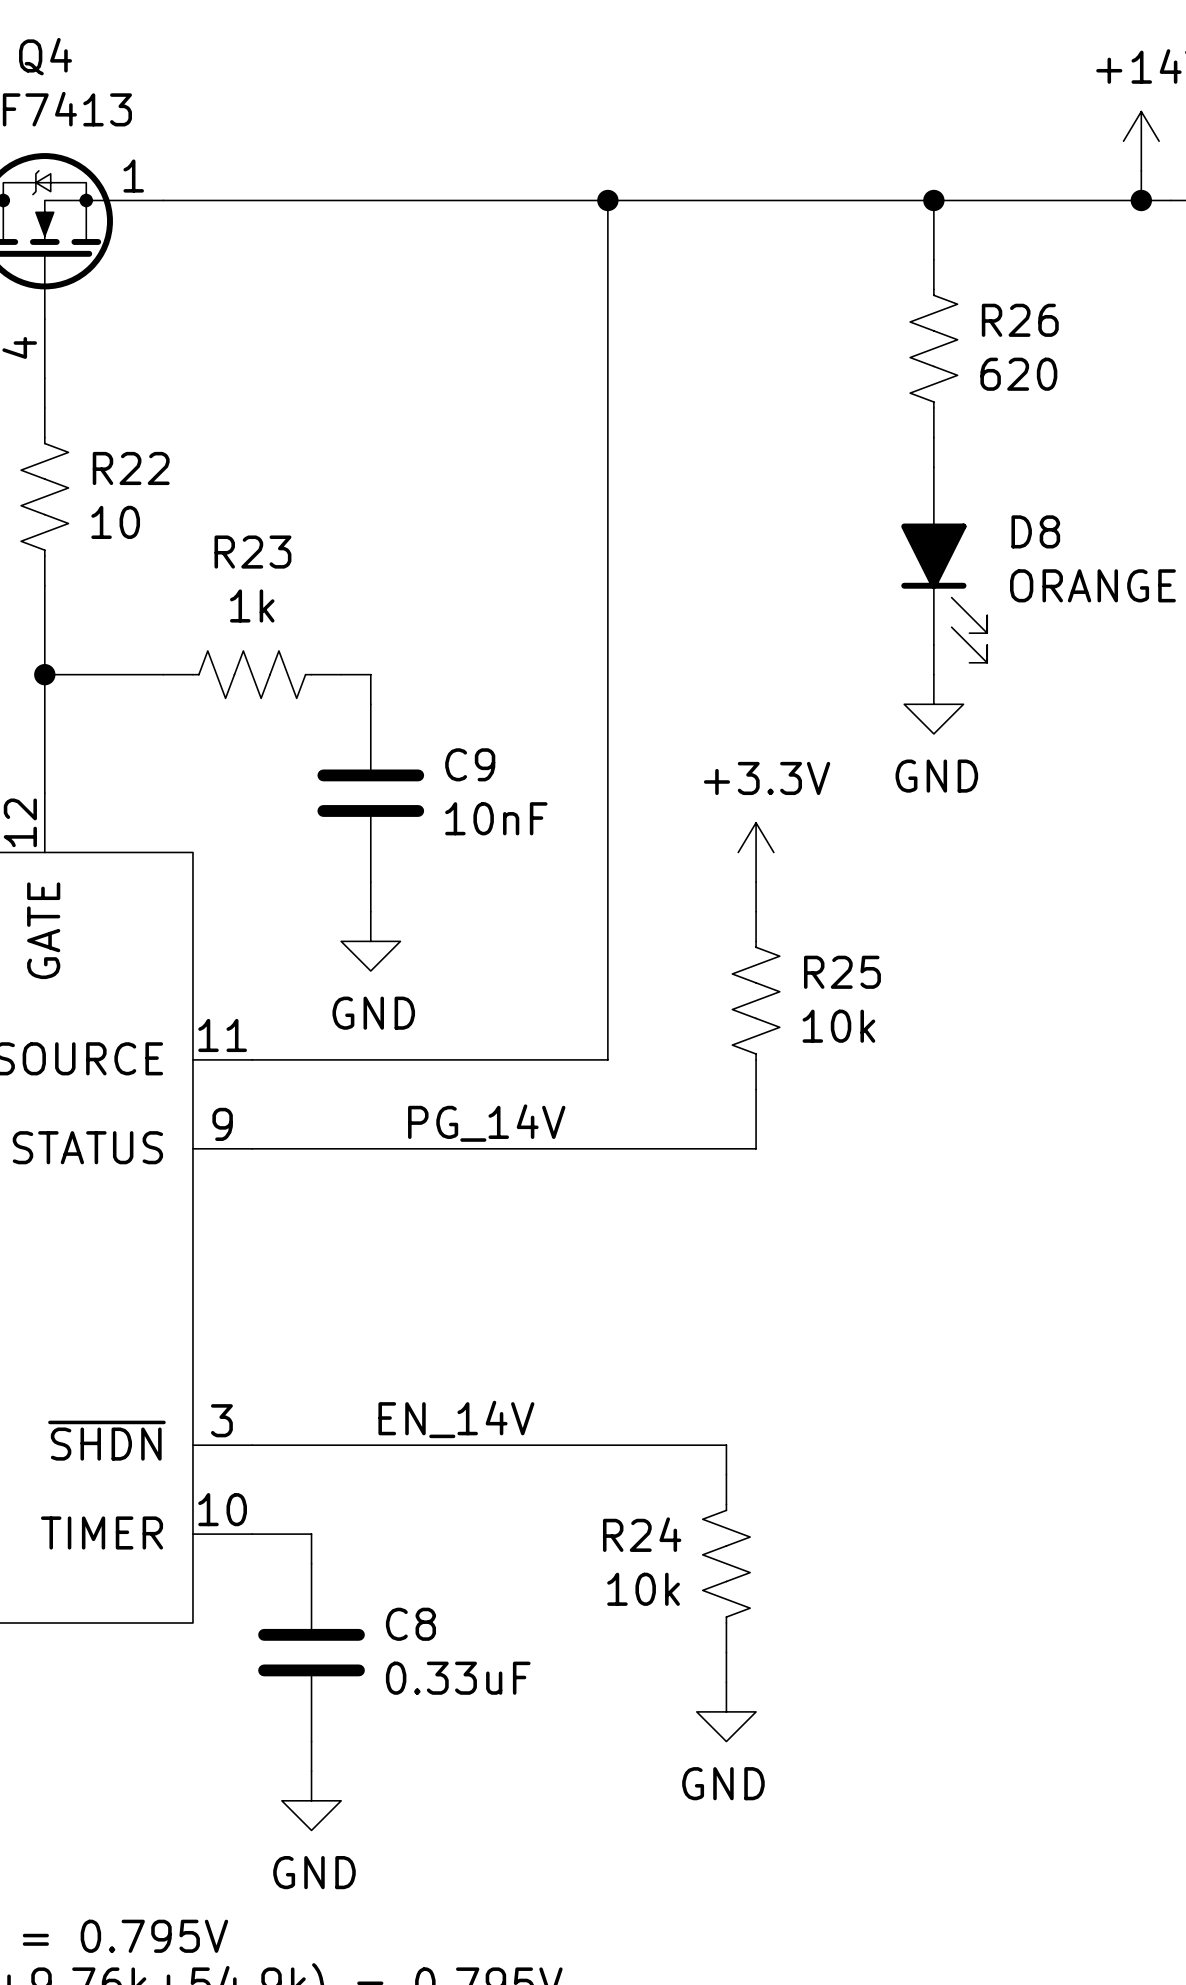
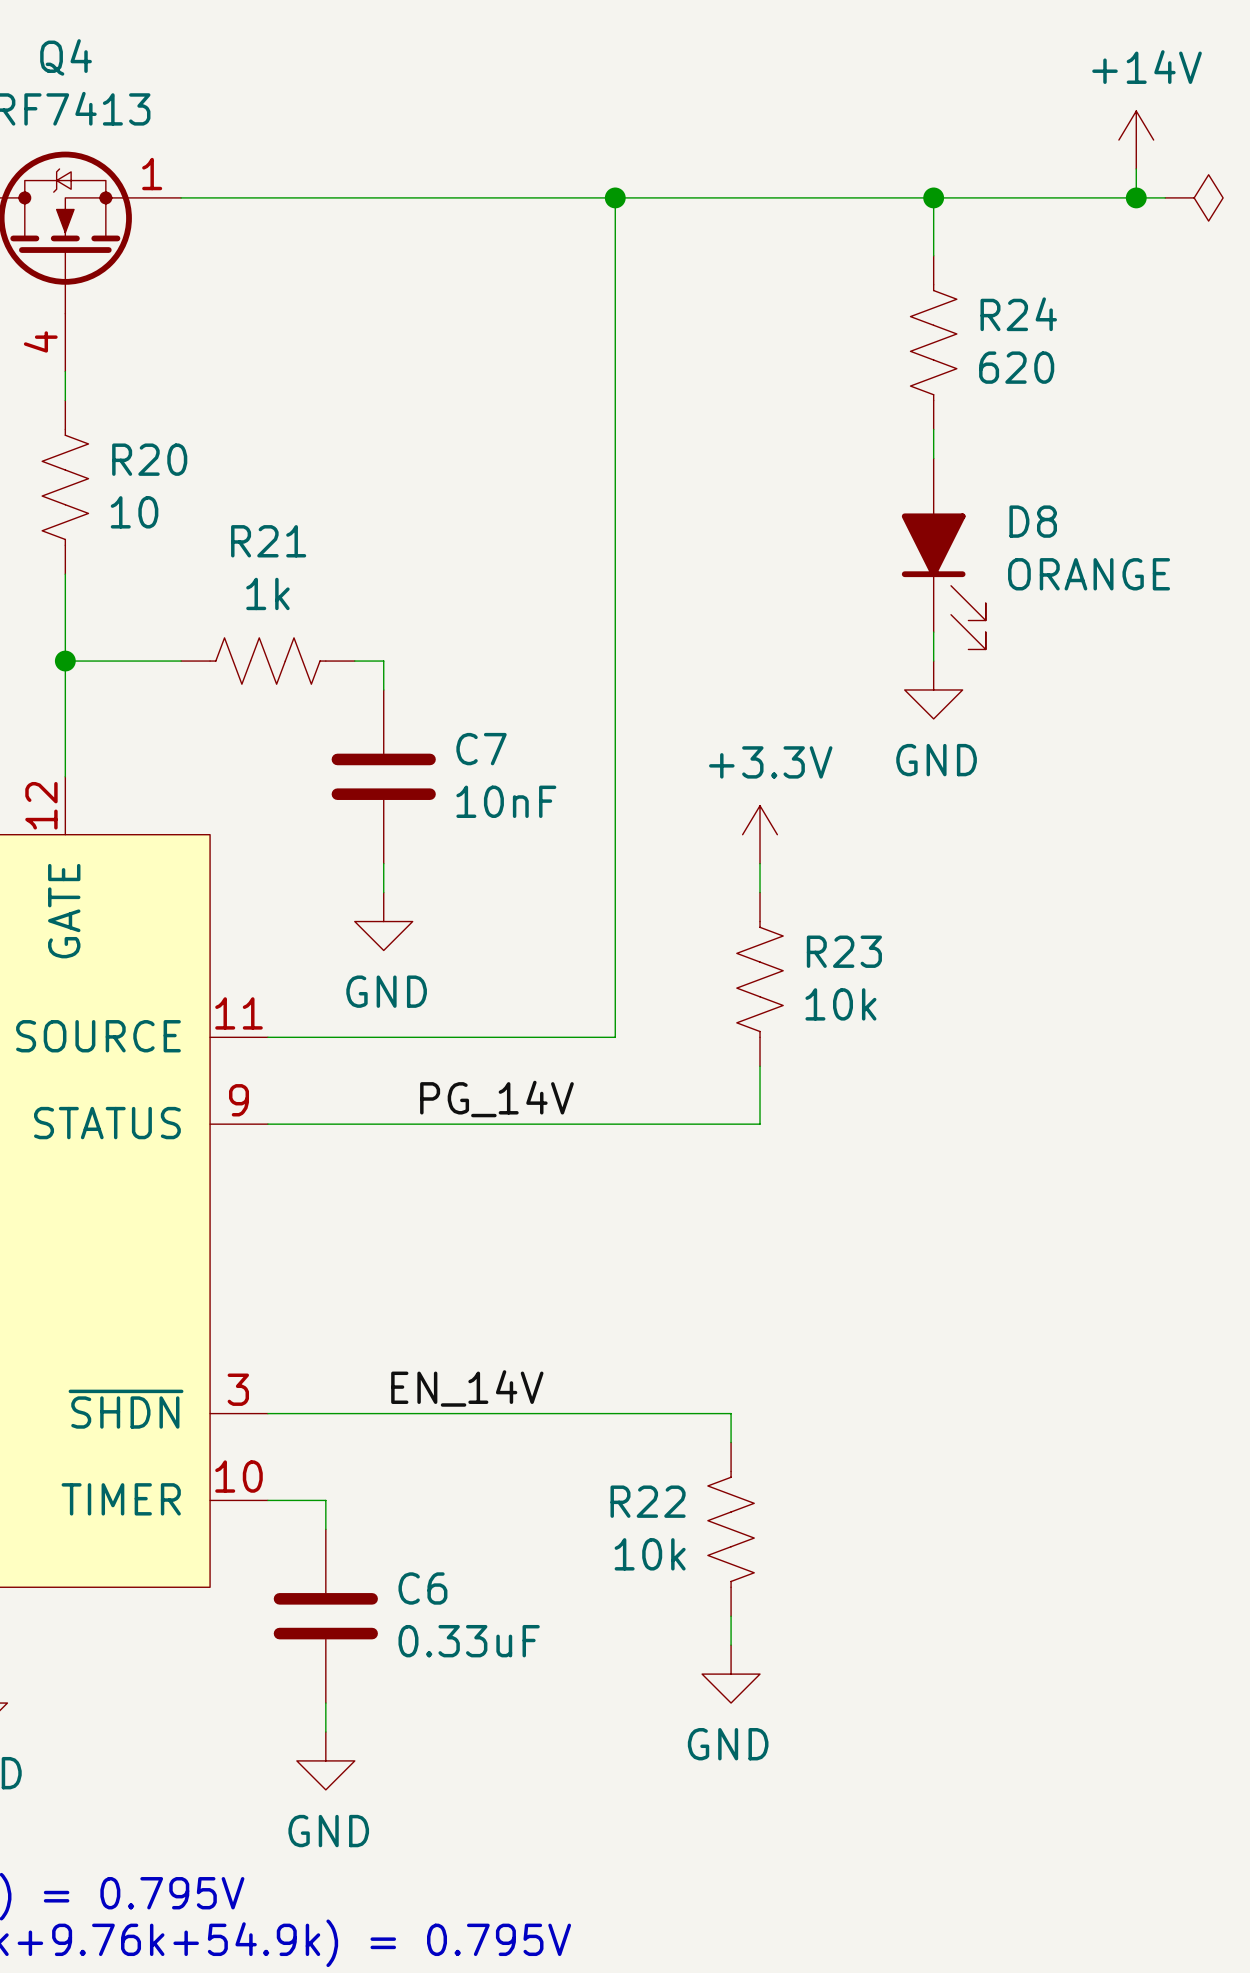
R26 name: R26 (1020, 320) -> R24 (1018, 314)
R22 name: R22 (131, 468) -> R20 (149, 459)
R23 name: R23 (252, 552) -> R21 (268, 541)
C9 name: C9 (470, 764) -> C7 (481, 749)
R25 name: R25 (842, 972) -> R23 (844, 951)
R24 name: R24 (642, 1534) -> R22 (648, 1501)
C8 name: C8 (410, 1624) -> C6 (422, 1588)

